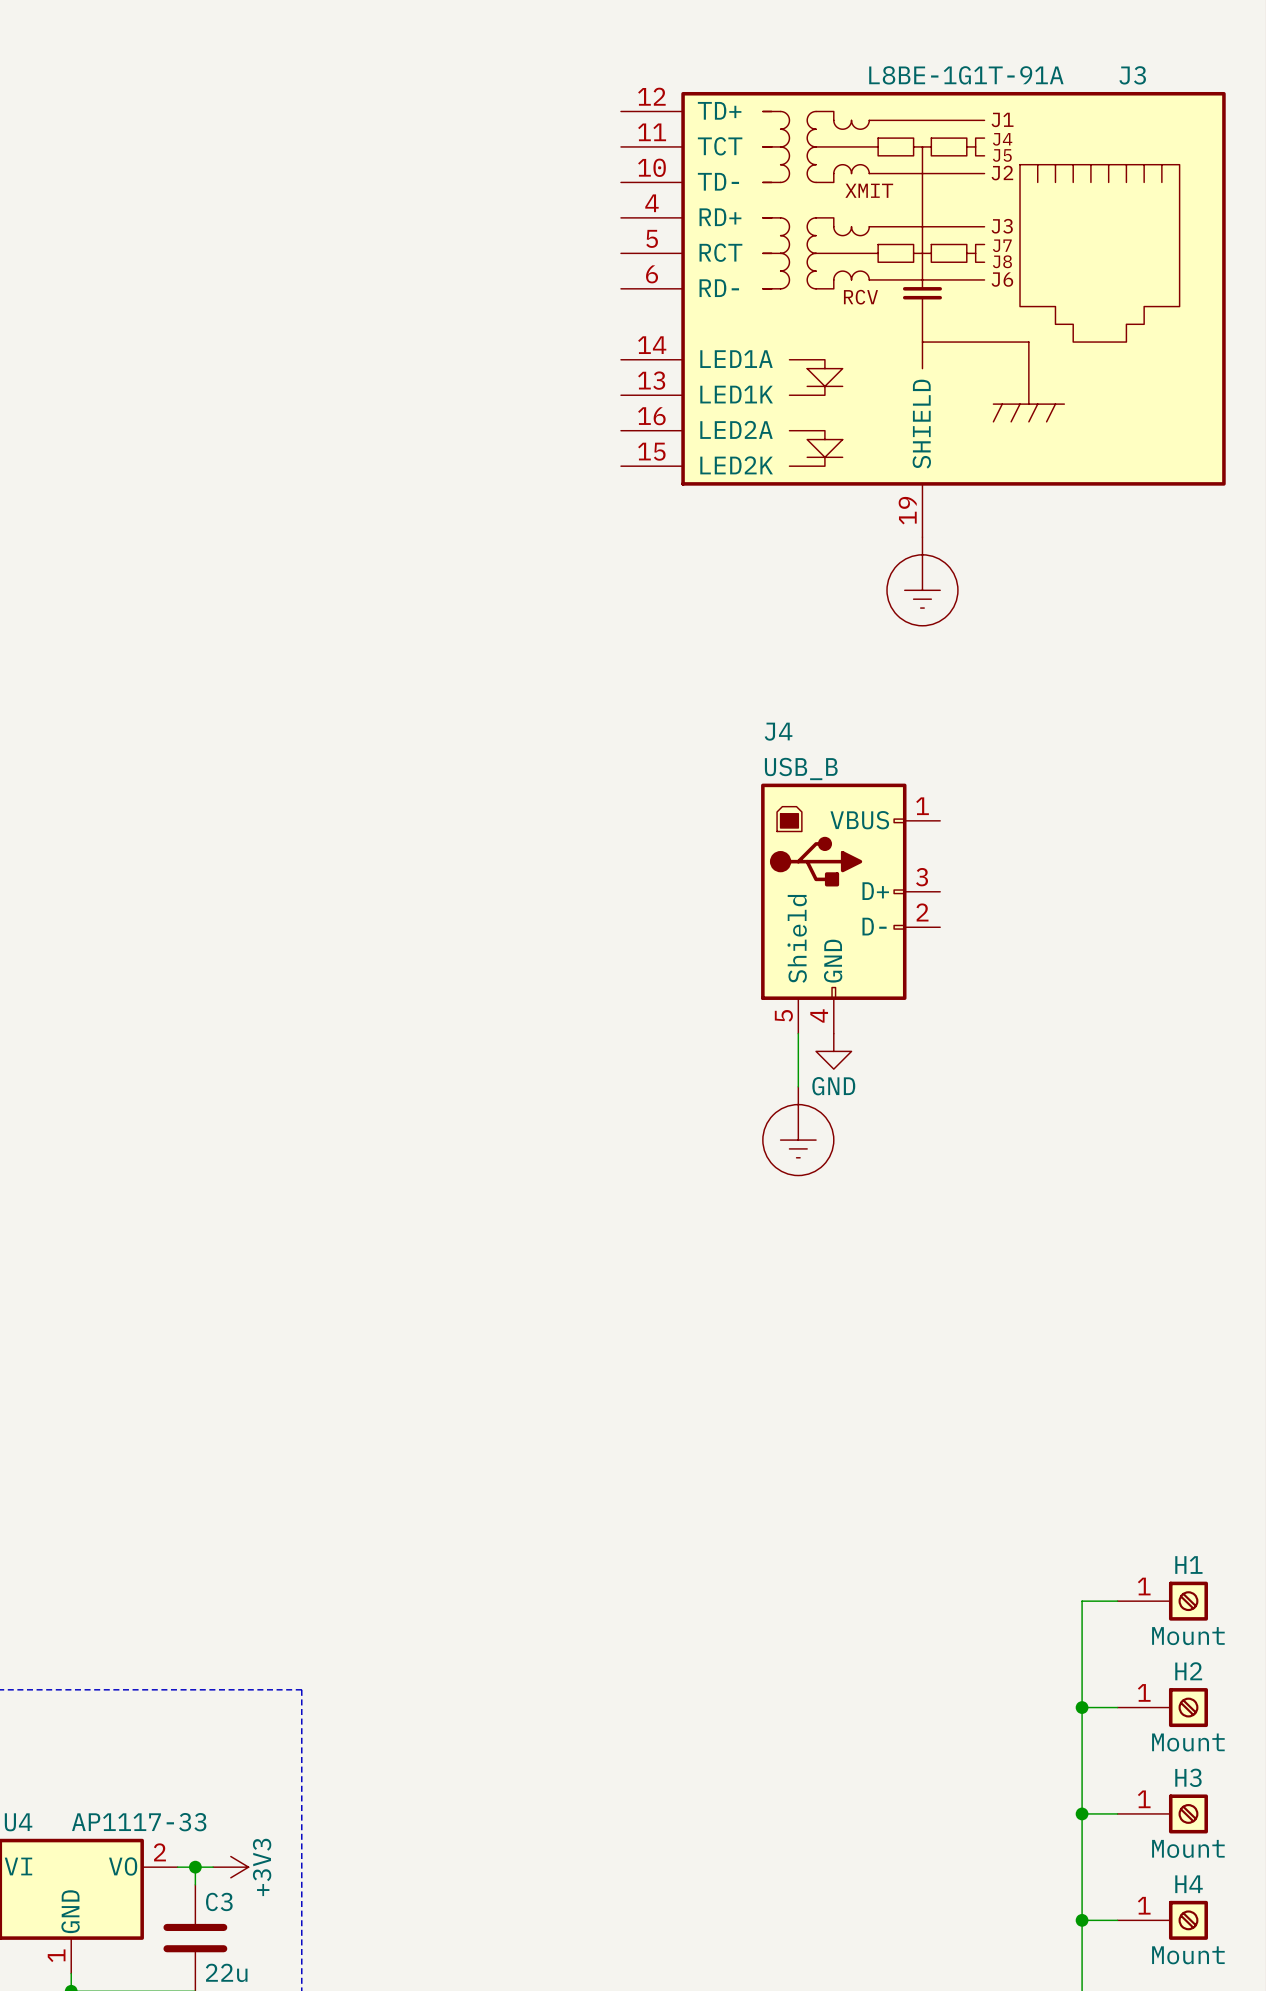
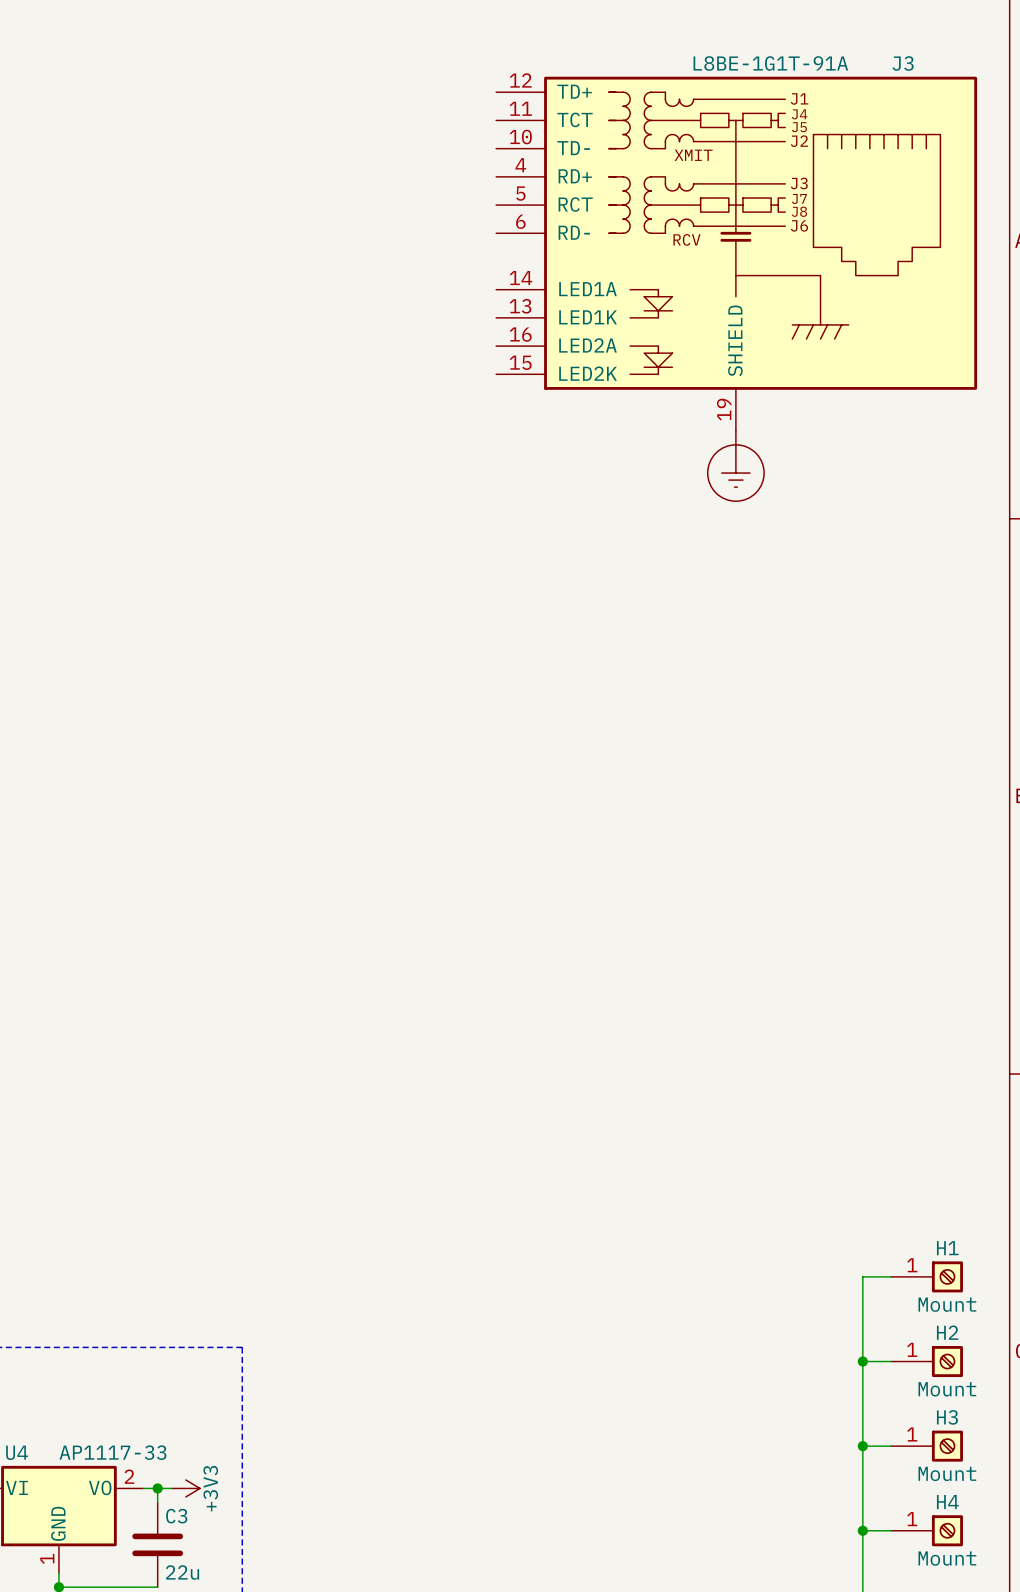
J4: USB_B (850, 908) -> none
wire: (798, 1033) (798, 1086) -> none
power symbol: GND (833, 1051) -> none
power symbol: (798, 1131) -> none

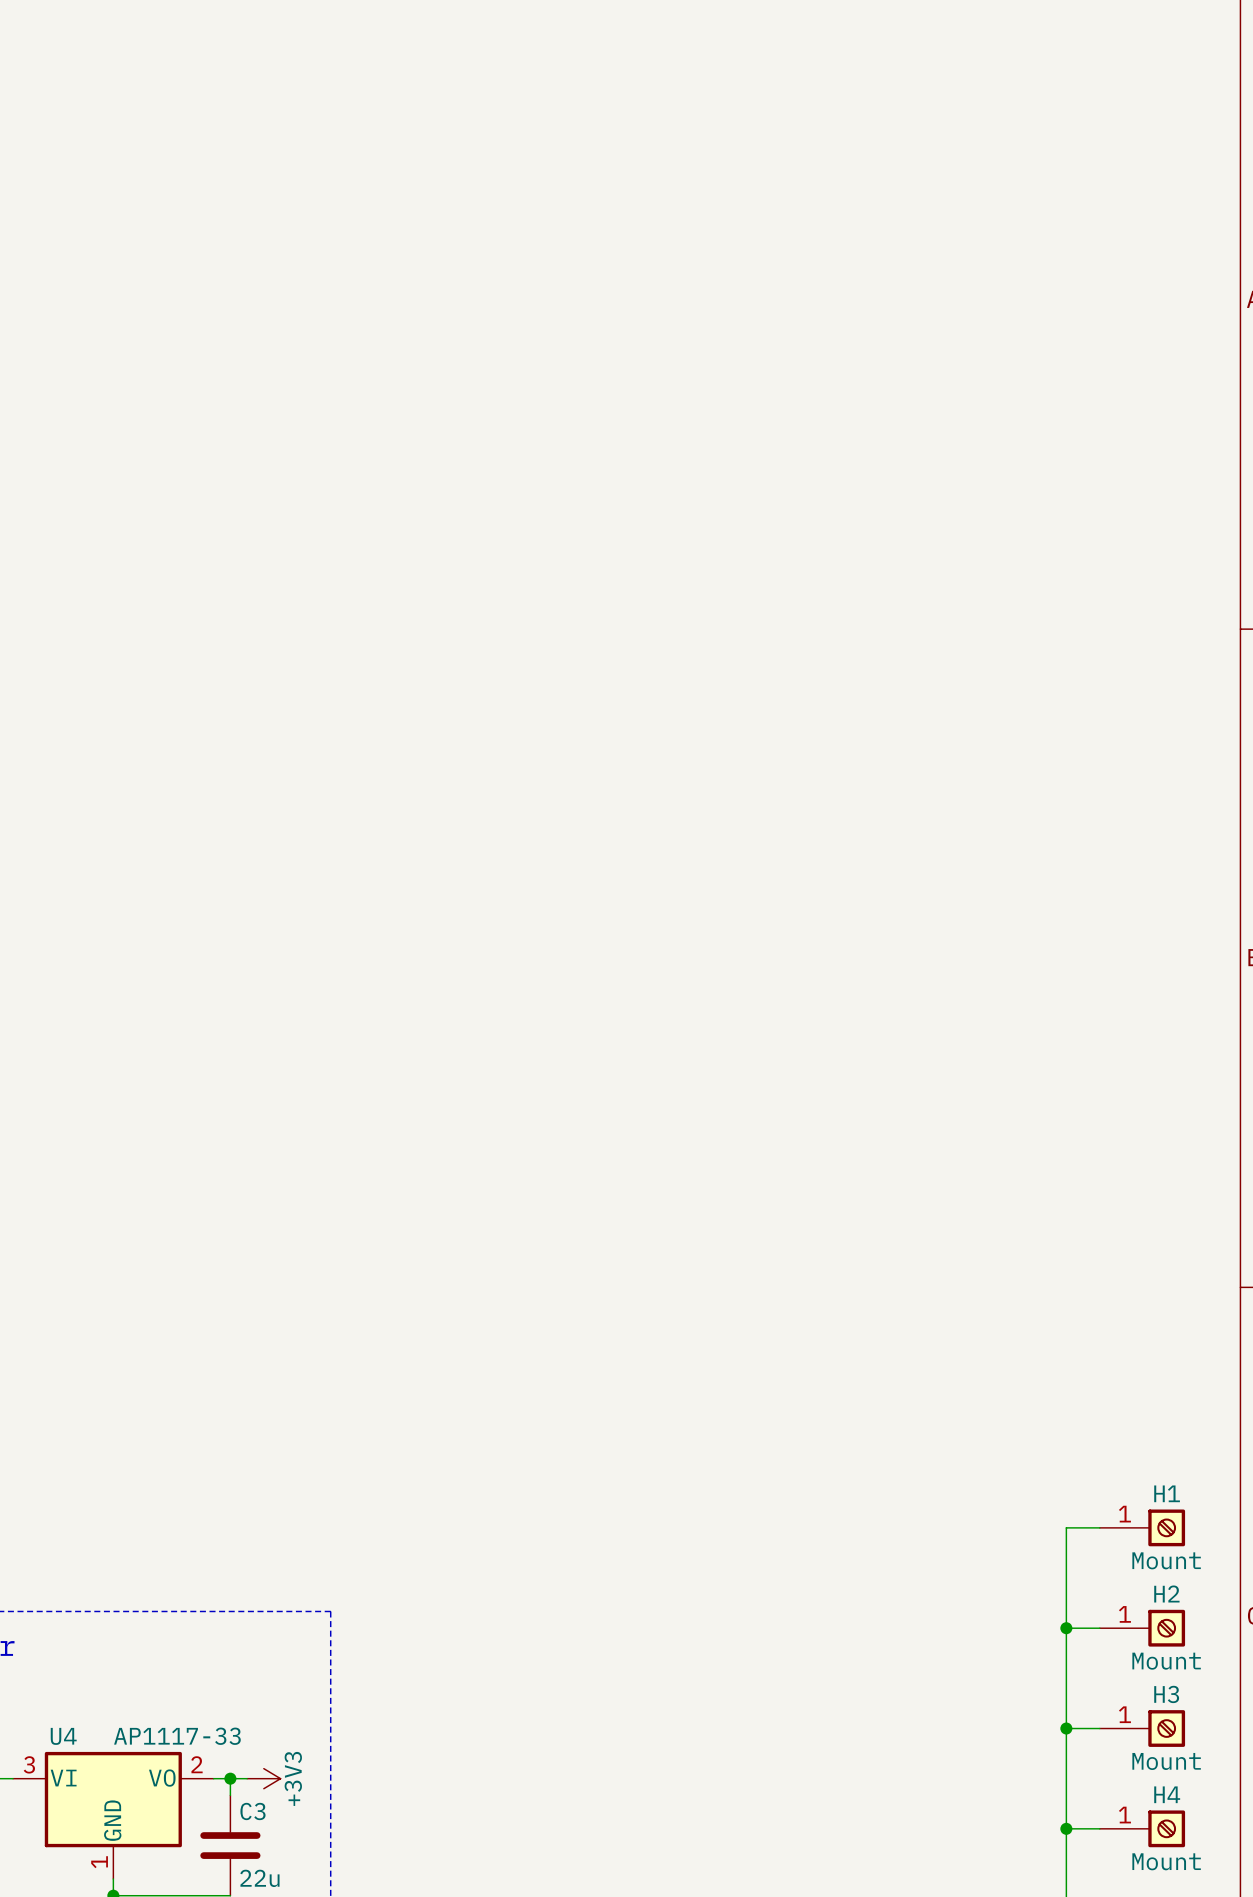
J3: L8BE-1G1T-91A (736, 253) -> none
power symbol: (735, 465) -> none

